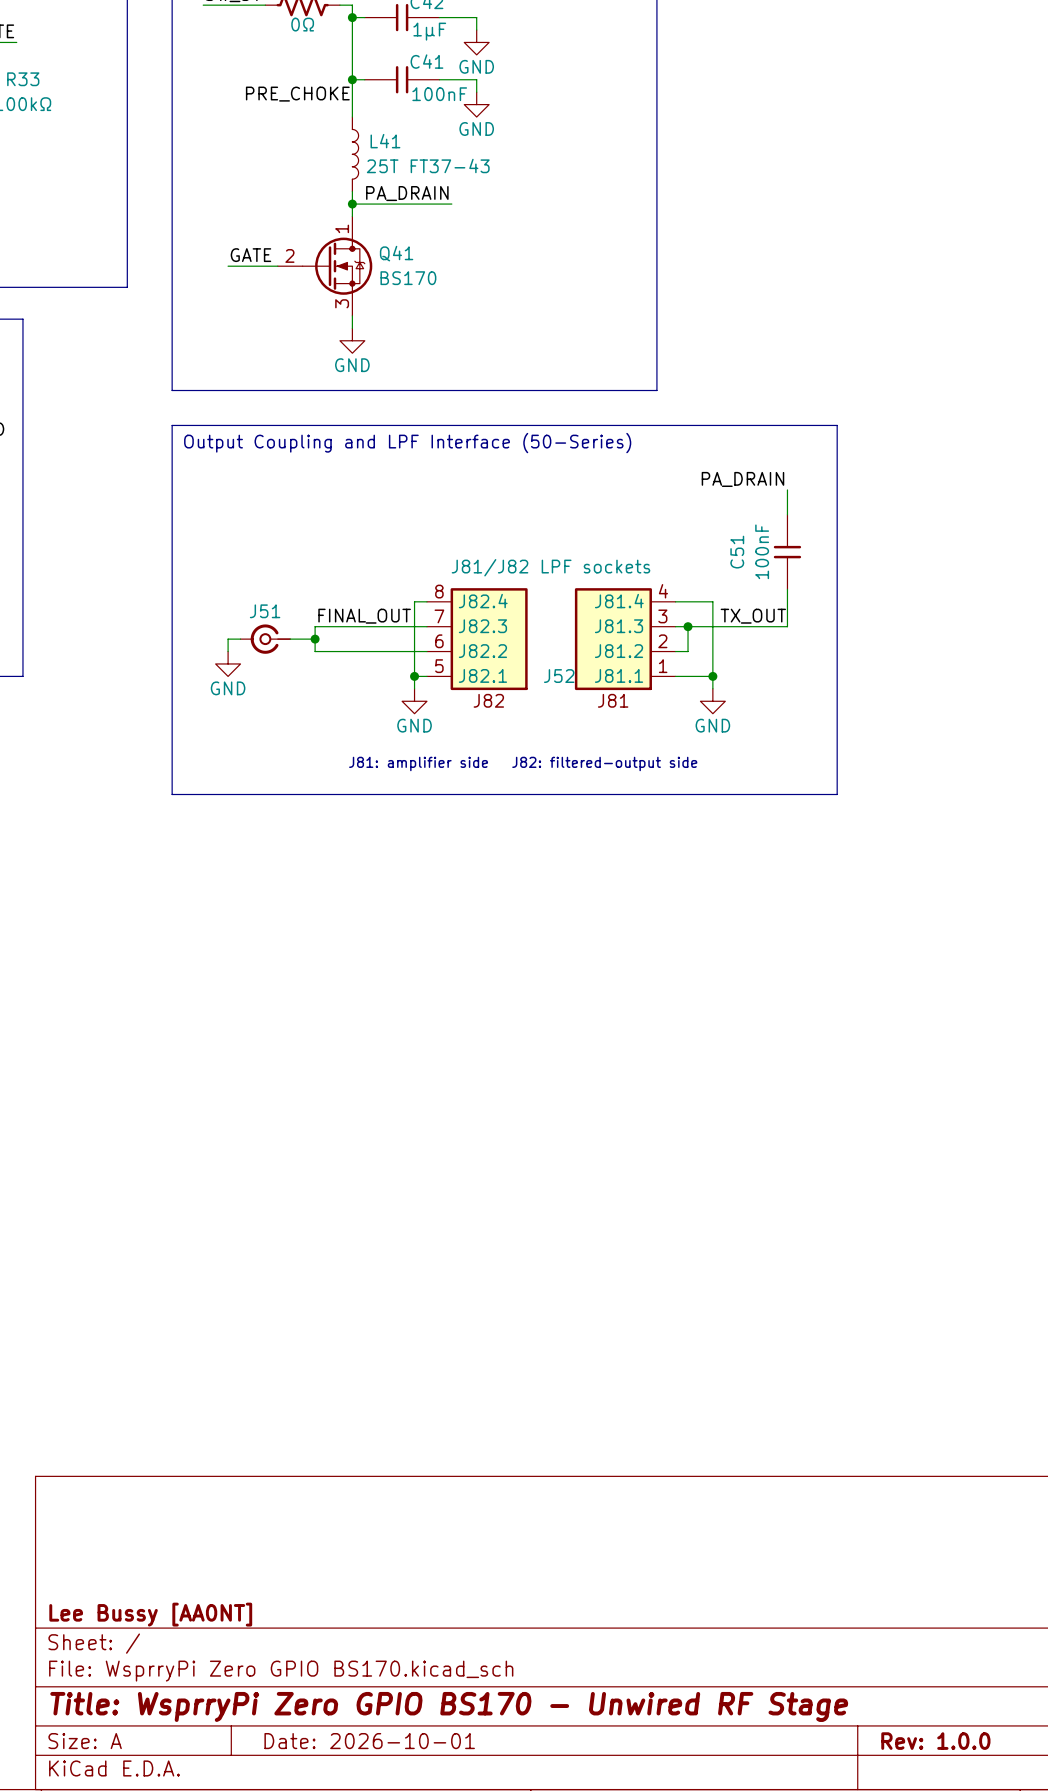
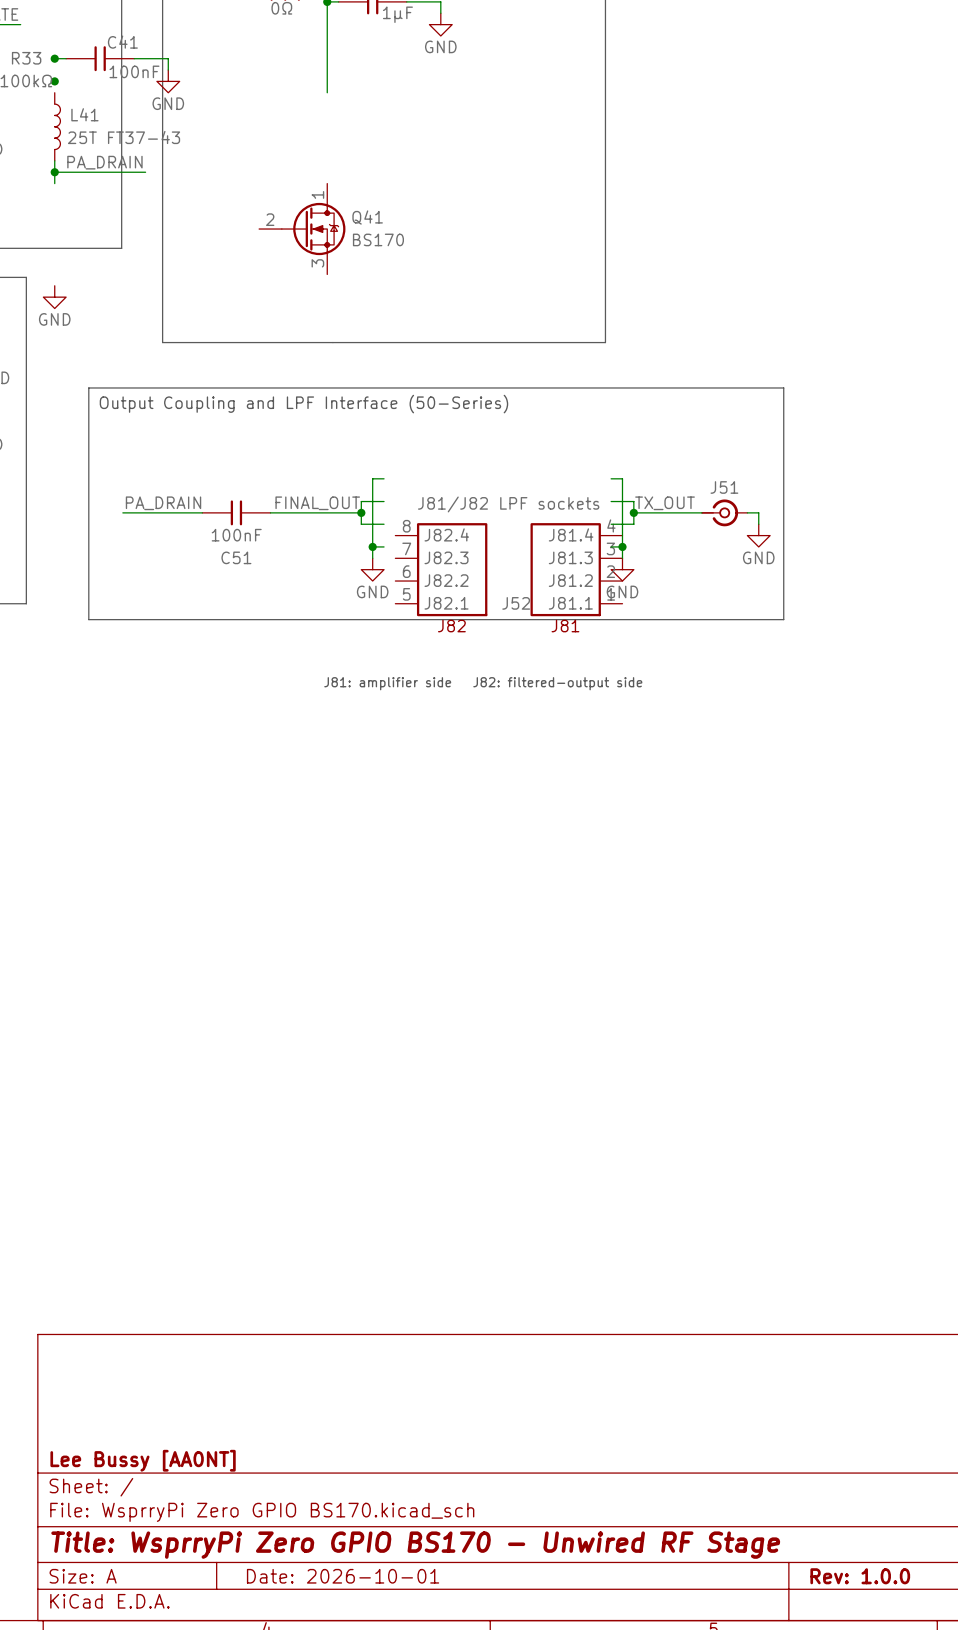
wire: none -> (54, 58) (66, 58)
junction: none -> (54, 58)
wire: none -> (134, 58) (168, 58) (168, 70)
wire: (352, 79) (364, 79) -> none
junction: (352, 79) -> none
C41 position: (402, 79) -> (100, 58)
wire: (439, 79) (476, 79) (476, 92) -> none
label: PRE_CHOKE (297, 94) -> none
junction: none -> (54, 81)
power symbol: none -> GND (168, 81)
power symbol: GND (476, 104) -> none
L41 position: (355, 154) -> (57, 126)
wire: none -> (54, 160) (54, 183)
wire: (352, 191) (352, 216) -> none
label: none -> PA_DRAIN (104, 162)
label: PA_DRAIN (407, 193) -> none
wire: none -> (54, 172) (145, 172)
junction: none -> (54, 172)
wire: (352, 204) (451, 204) -> none
junction: (352, 204) -> none
label: GATE (250, 255) -> none
wire: (228, 266) (277, 266) -> none
wire: (352, 315) (352, 328) -> none
power symbol: none -> GND (54, 297)
power symbol: GND (352, 340) -> none
line: (172, 425) (837, 425) (837, 794) (172, 794) (172, 425) -> (88, 387) (88, 619) (783, 619) (783, 387) (88, 387)
text position: Output Coupling and LPF Interface (50-Series) (407, 443) -> Output Coupling and LPF Interface (50-Series) (303, 404)
label: PA_DRAIN (742, 479) -> none
wire: (787, 489) (787, 514) -> none
C51 value position: 100nF (762, 551) -> 100nF (236, 535)
C51 name position: C51 (737, 552) -> C51 (236, 557)
C51 rotation: 0° (787, 552) -> 90° clockwise (236, 512)
C51 position: (787, 552) -> (236, 512)
wire: none -> (384, 501) (361, 501) (361, 524) (384, 524)
wire: none -> (611, 501) (633, 501) (633, 524) (611, 524)
label: none -> PA_DRAIN (163, 503)
wire: none -> (122, 512) (202, 512)
wire: none -> (270, 512) (361, 512)
junction: none -> (361, 512)
wire: none -> (633, 512) (701, 512)
junction: none -> (633, 512)
wire: none -> (747, 512) (758, 512) (758, 524)
wire: (787, 589) (787, 626) (675, 626) -> (611, 478) (622, 478) (622, 558)
wire: (426, 601) (414, 601) (414, 688) -> (384, 478) (372, 478) (372, 558)
wire: (675, 601) (712, 601) (712, 688) -> none
power symbol: none -> GND (758, 535)
junction: none -> (372, 546)
wire: none -> (611, 546) (622, 546)
label position: FINAL_OUT (364, 616) -> FINAL_OUT (317, 503)
label position: TX_OUT (753, 616) -> TX_OUT (665, 503)
wire: (426, 626) (315, 626) (315, 651) (426, 651) -> none
wire: (688, 626) (688, 651) (675, 651) -> none
junction position: (688, 626) -> (622, 546)
wire: (240, 639) (228, 639) (228, 651) -> none
J51 position: (265, 639) -> (724, 512)
J51 rotation: 0° (270, 639) -> 180° (720, 512)
wire: (290, 639) (315, 639) -> none
junction: (315, 639) -> none
power symbol: GND (228, 663) -> none
wire: (414, 676) (426, 676) -> (372, 546) (384, 546)
junction: (414, 676) -> none
wire: (675, 676) (712, 676) -> none
junction: (712, 676) -> none
power symbol position: GND (414, 701) -> GND (372, 569)
power symbol position: GND (712, 701) -> GND (622, 569)

